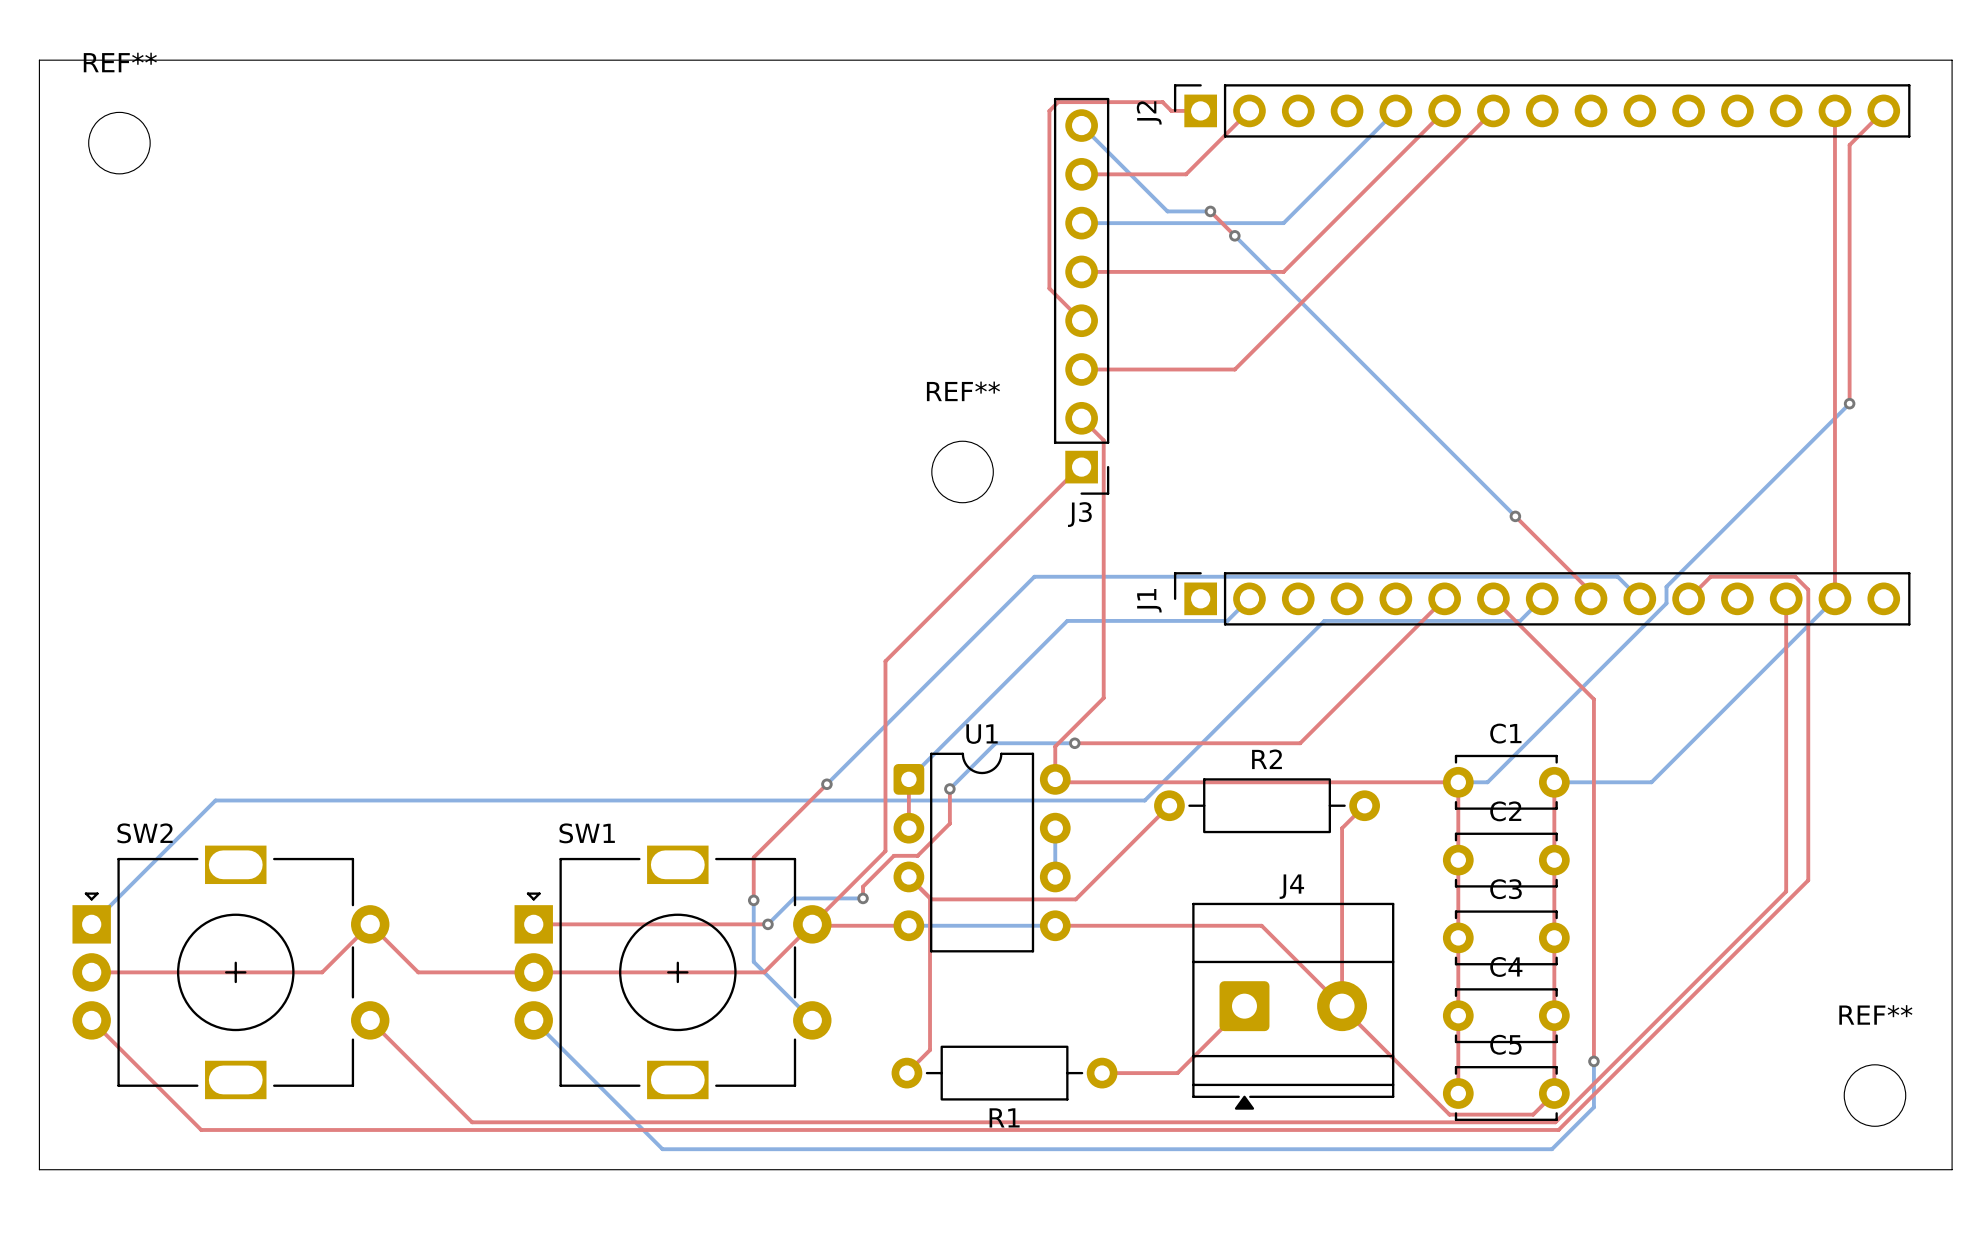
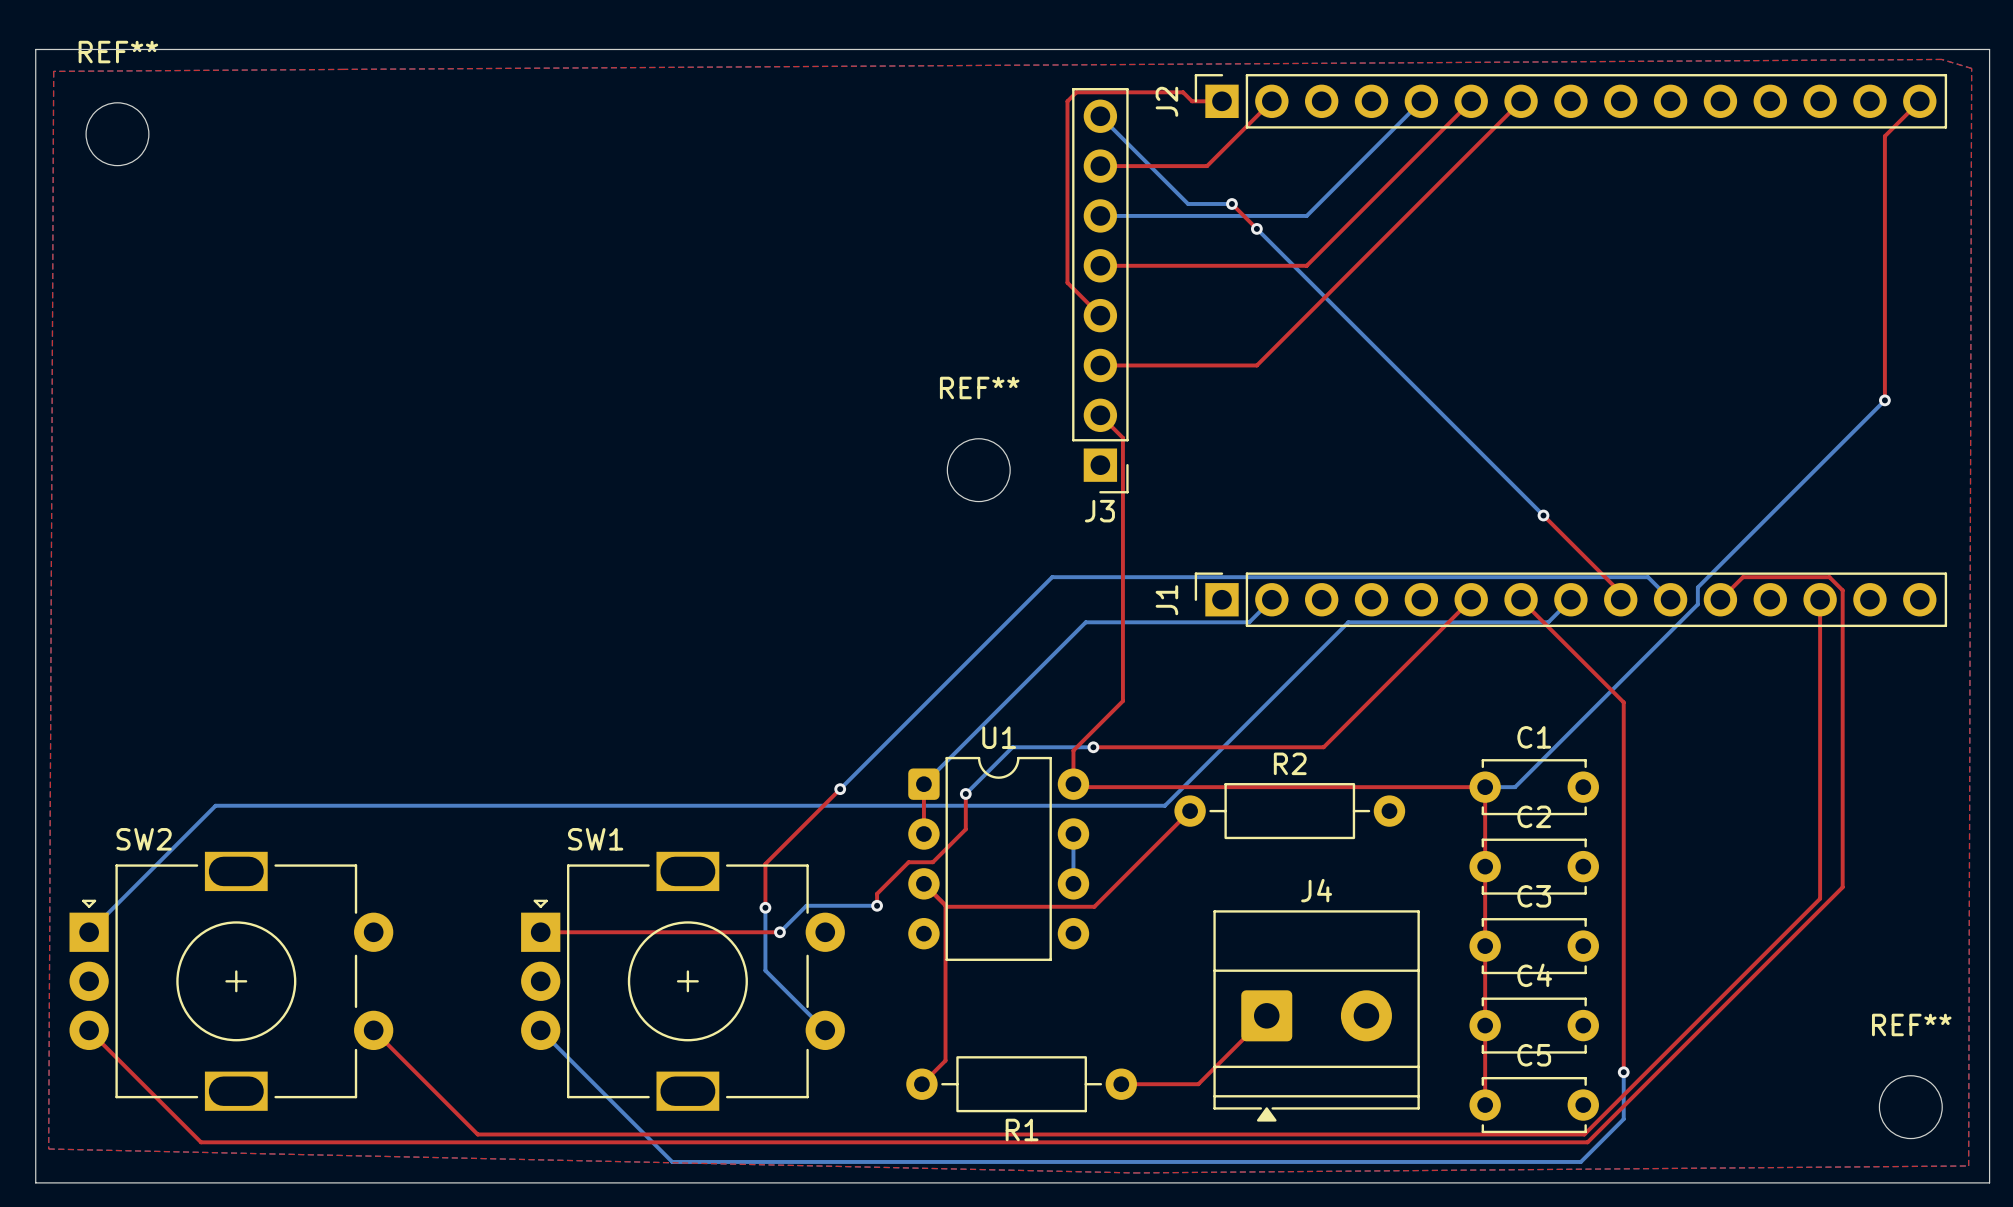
top zone outline: none -> (1941, 59) (1971, 68) (1968, 1165) (1134, 1172) (48, 1149) (53, 71) (1941, 59)
top track: (1834, 110) (1834, 598) -> none
top track: (1081, 467) (885, 661) (885, 851) (764, 972) (418, 972) (370, 924) (322, 972) (91, 972) -> none
bottom track: (1834, 598) (1651, 782) (1554, 782) -> none
top track: (1554, 782) (1554, 1093) (1533, 1114) (1449, 1114) (1342, 1007) (1342, 828) (1364, 805) -> none
top track: (812, 924) (908, 925) -> none
bottom track: (908, 925) (1055, 925) -> none
top track: (1055, 925) (1261, 925) (1342, 1006) -> none

